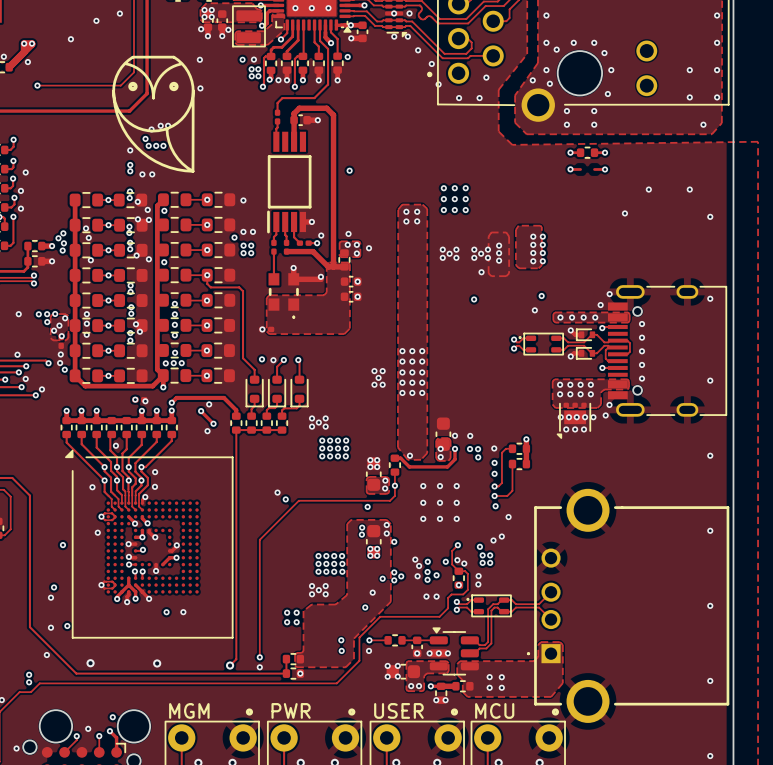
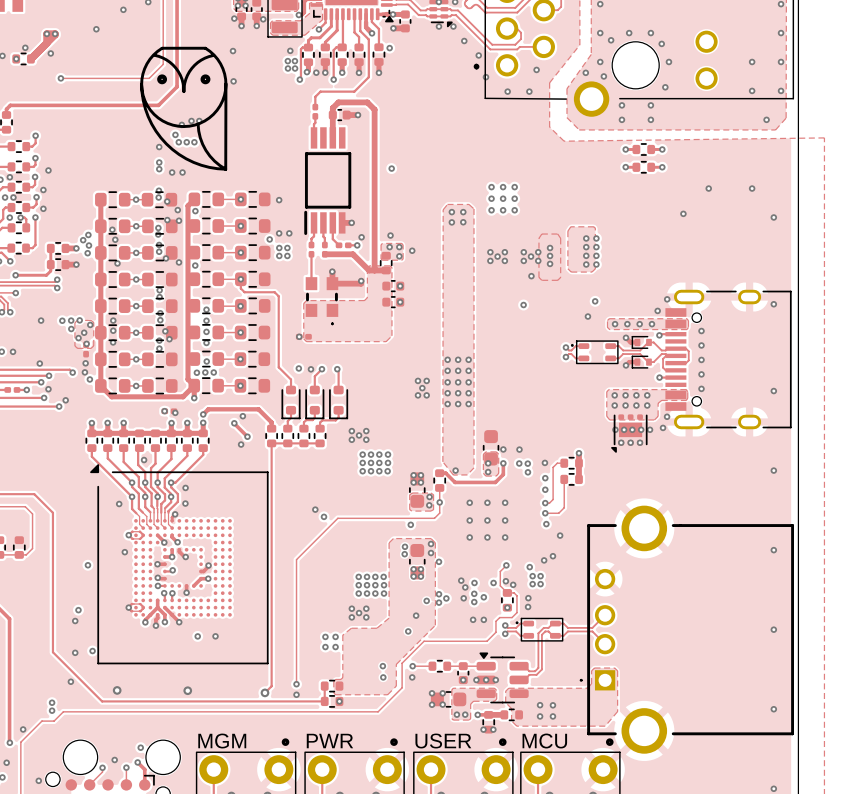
via: (242, 59) -> none
part: none -> (643, 167)

